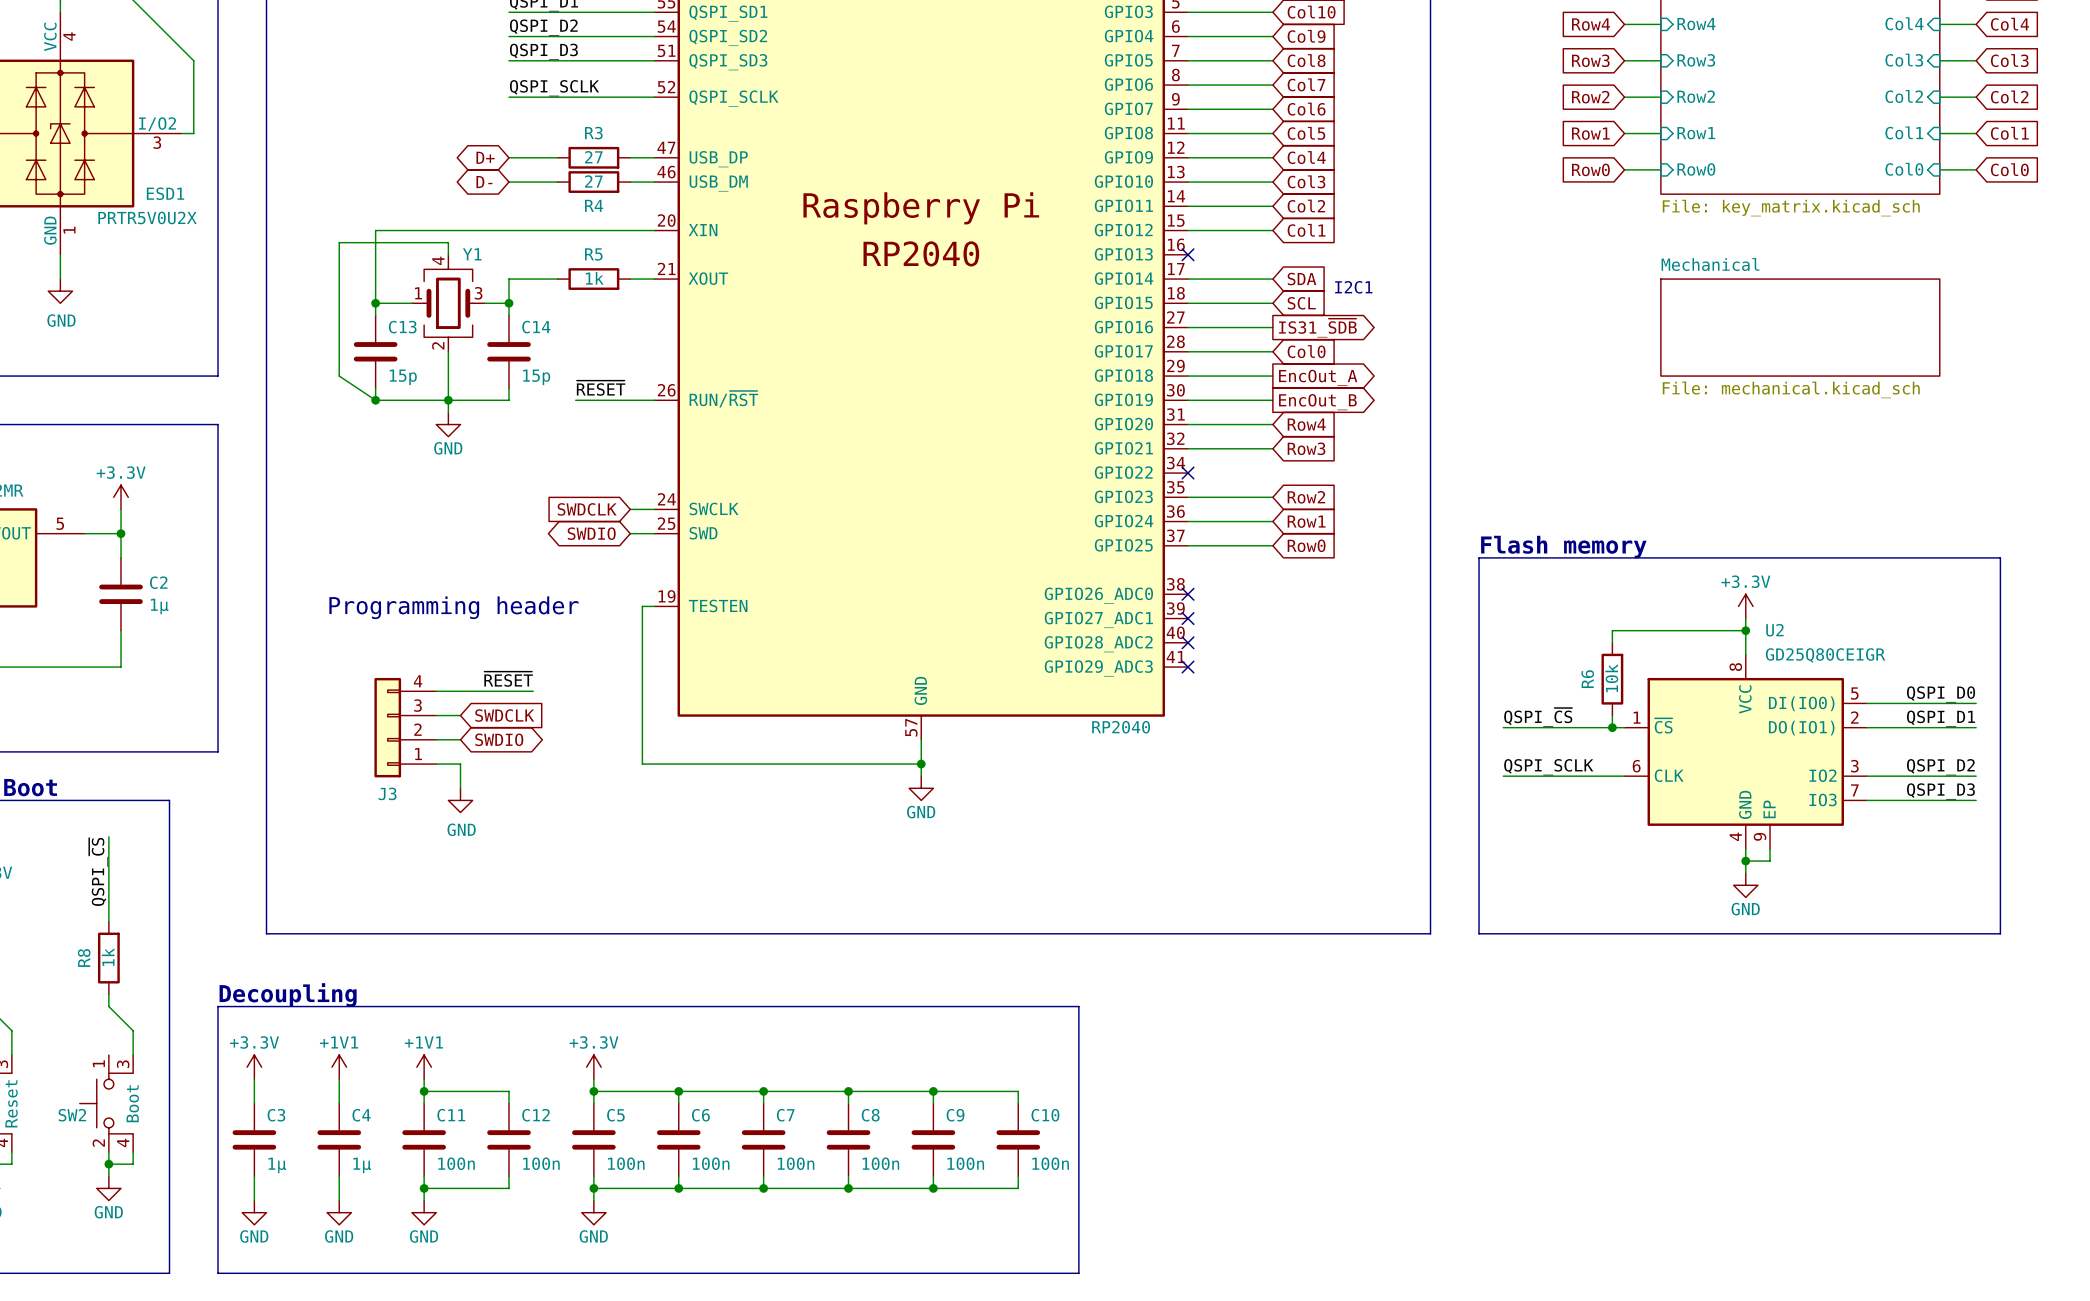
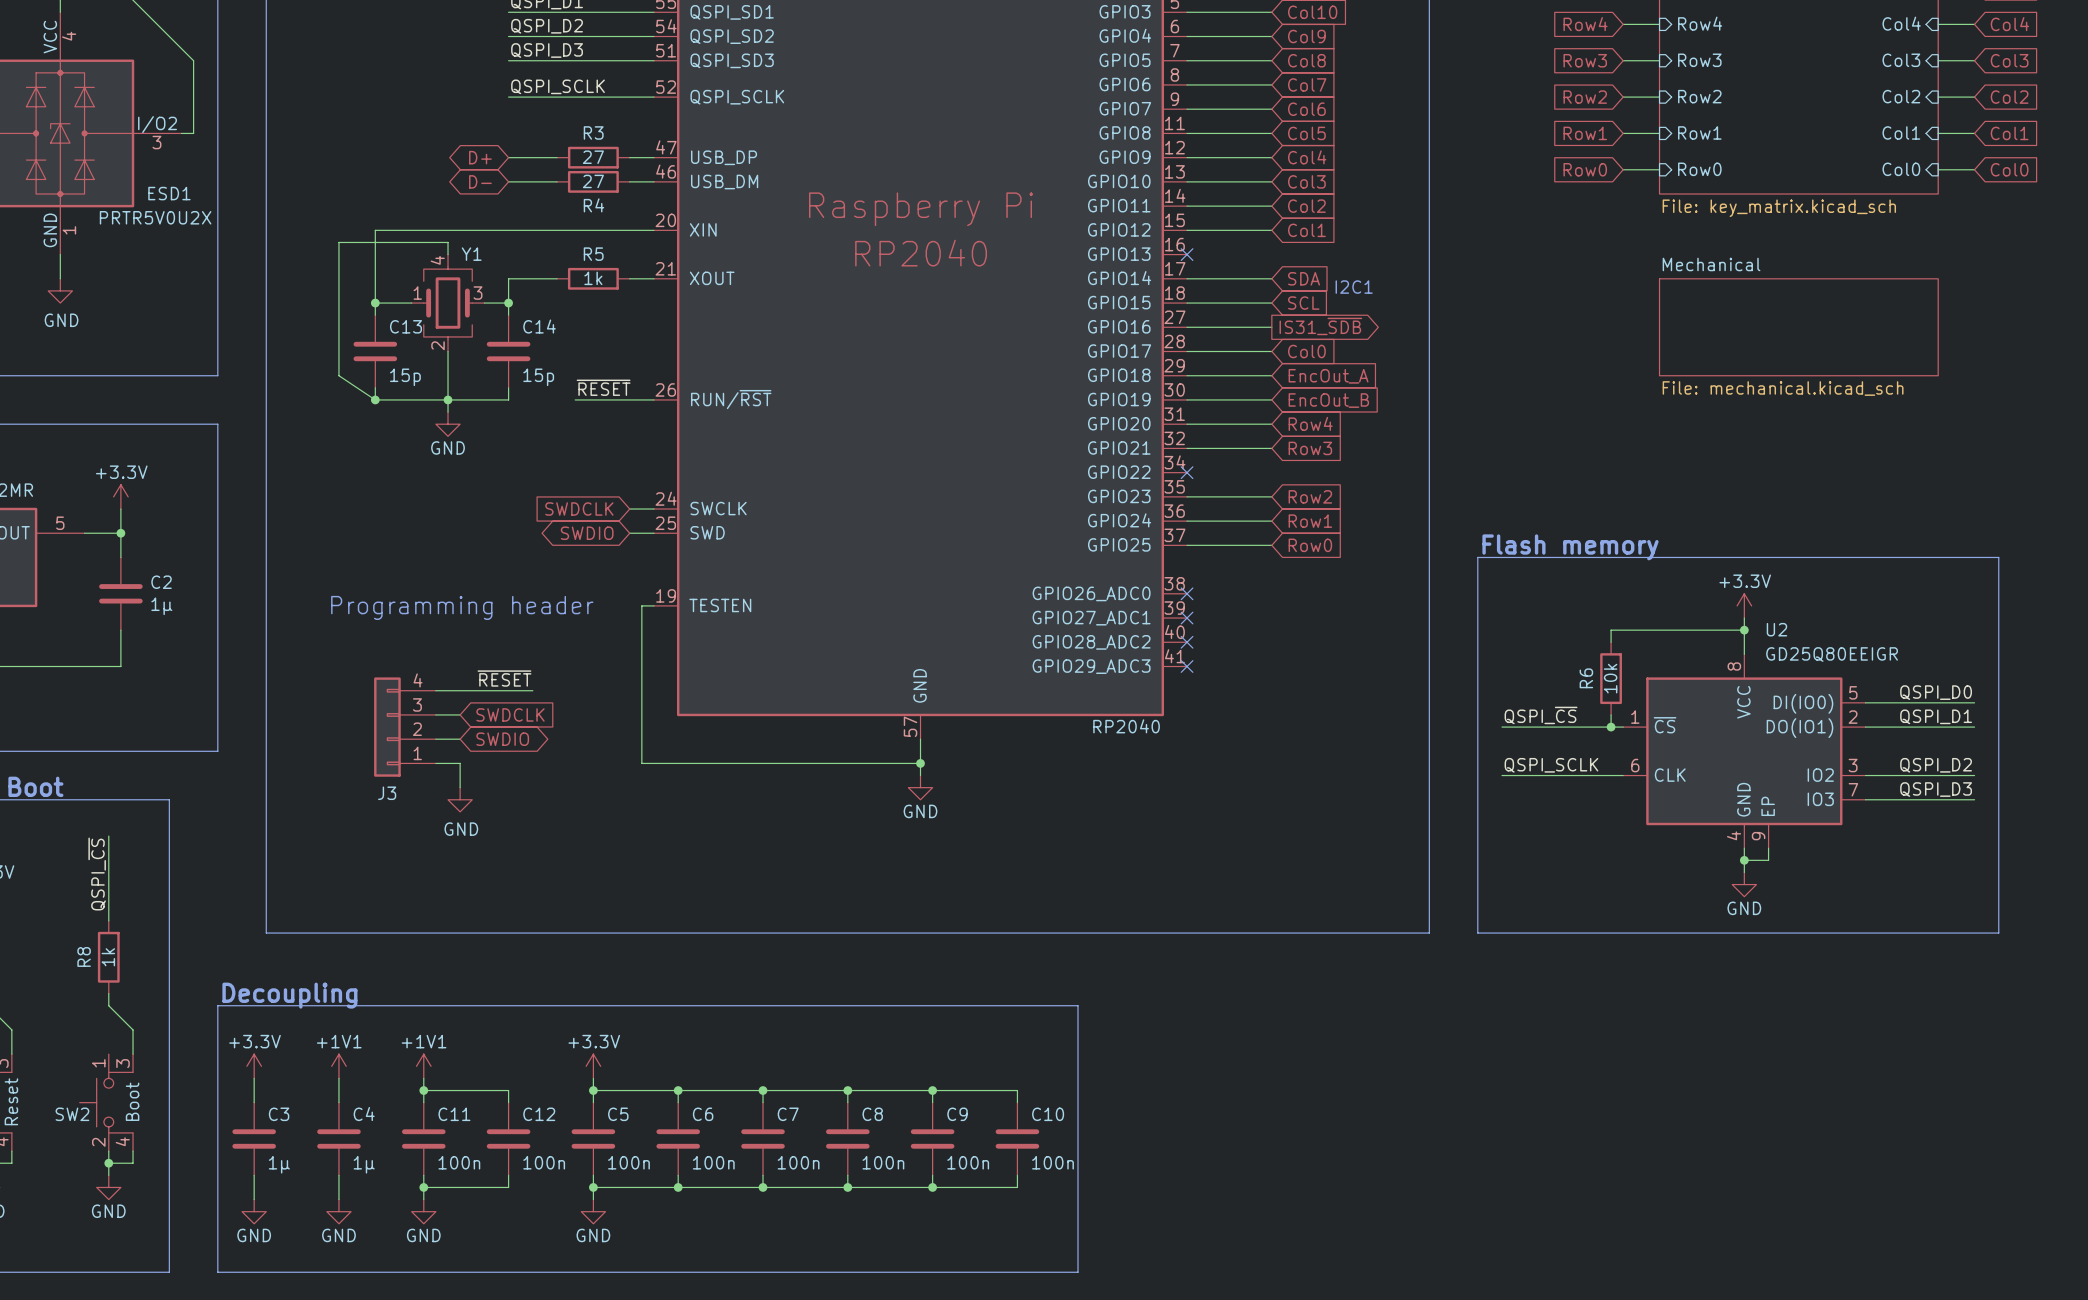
global label shape: output (1318, 377) -> input (1328, 376)
global label shape: output (1317, 402) -> input (1328, 400)
U2 value: GD25Q80CEIGR (1825, 655) -> GD25Q80EEIGR (1832, 654)

